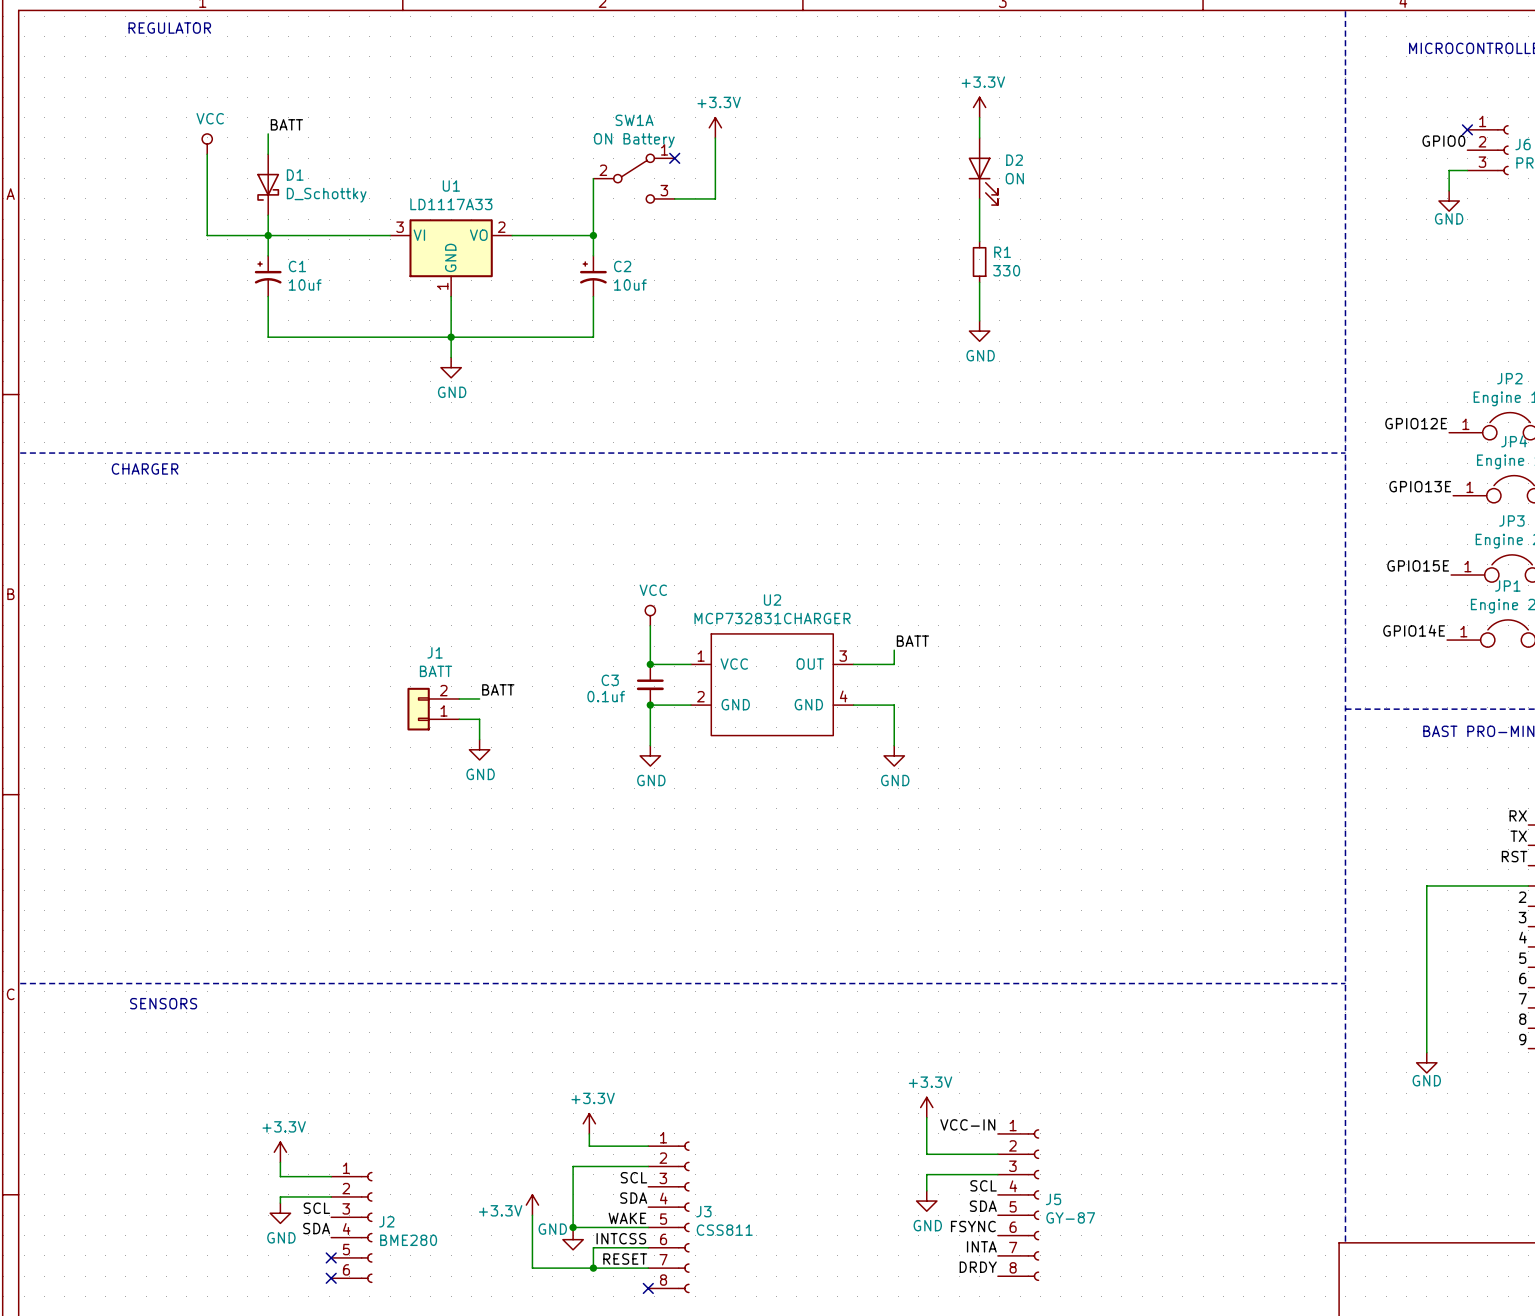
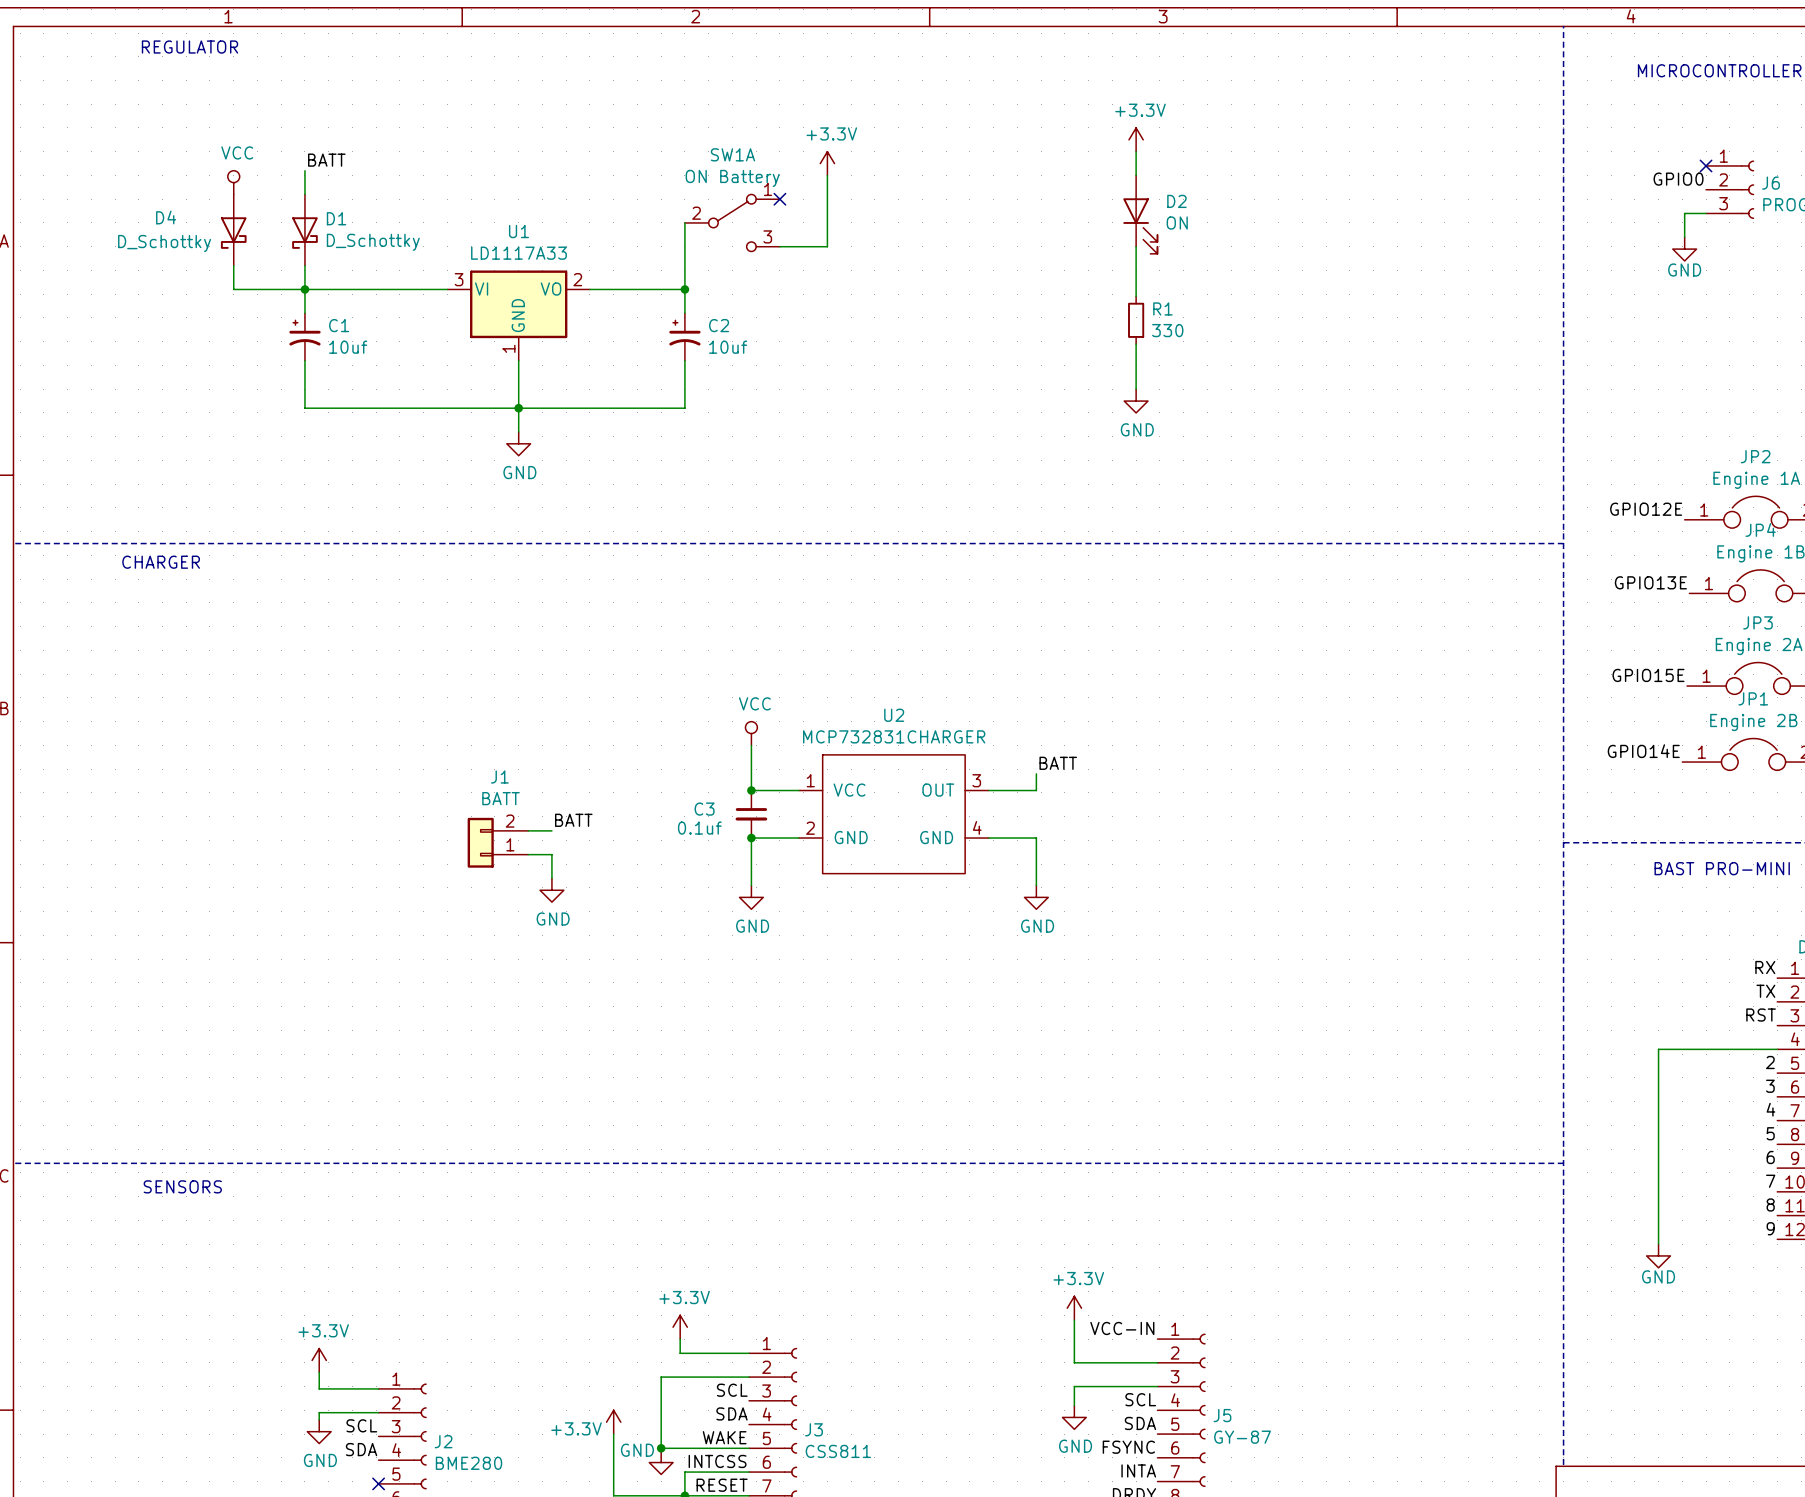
D4: none -> D_Schottky (233, 230)

